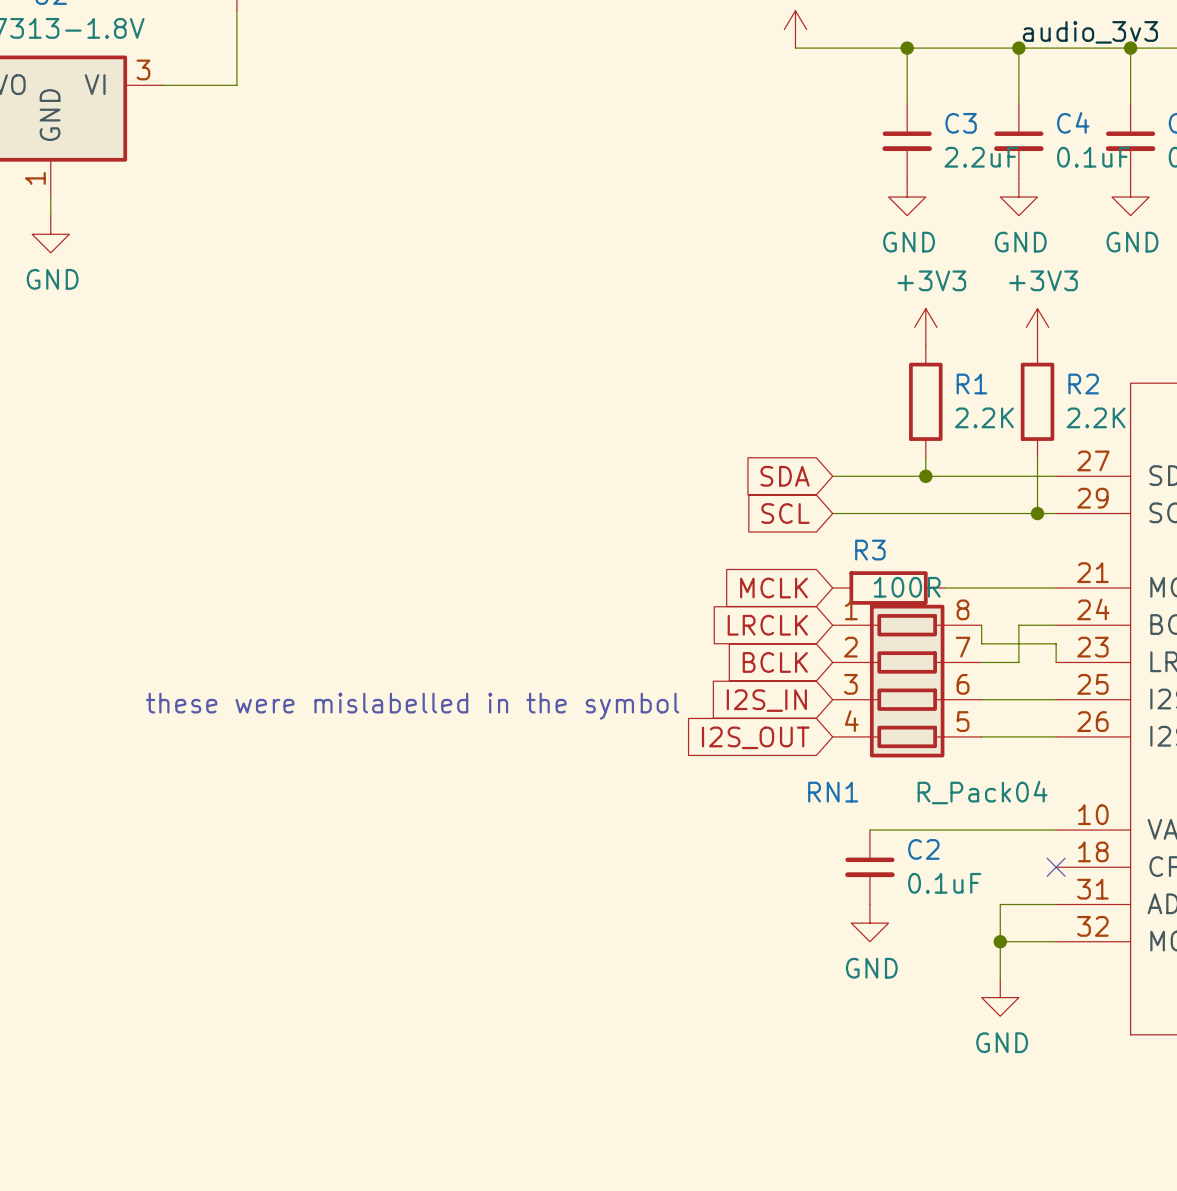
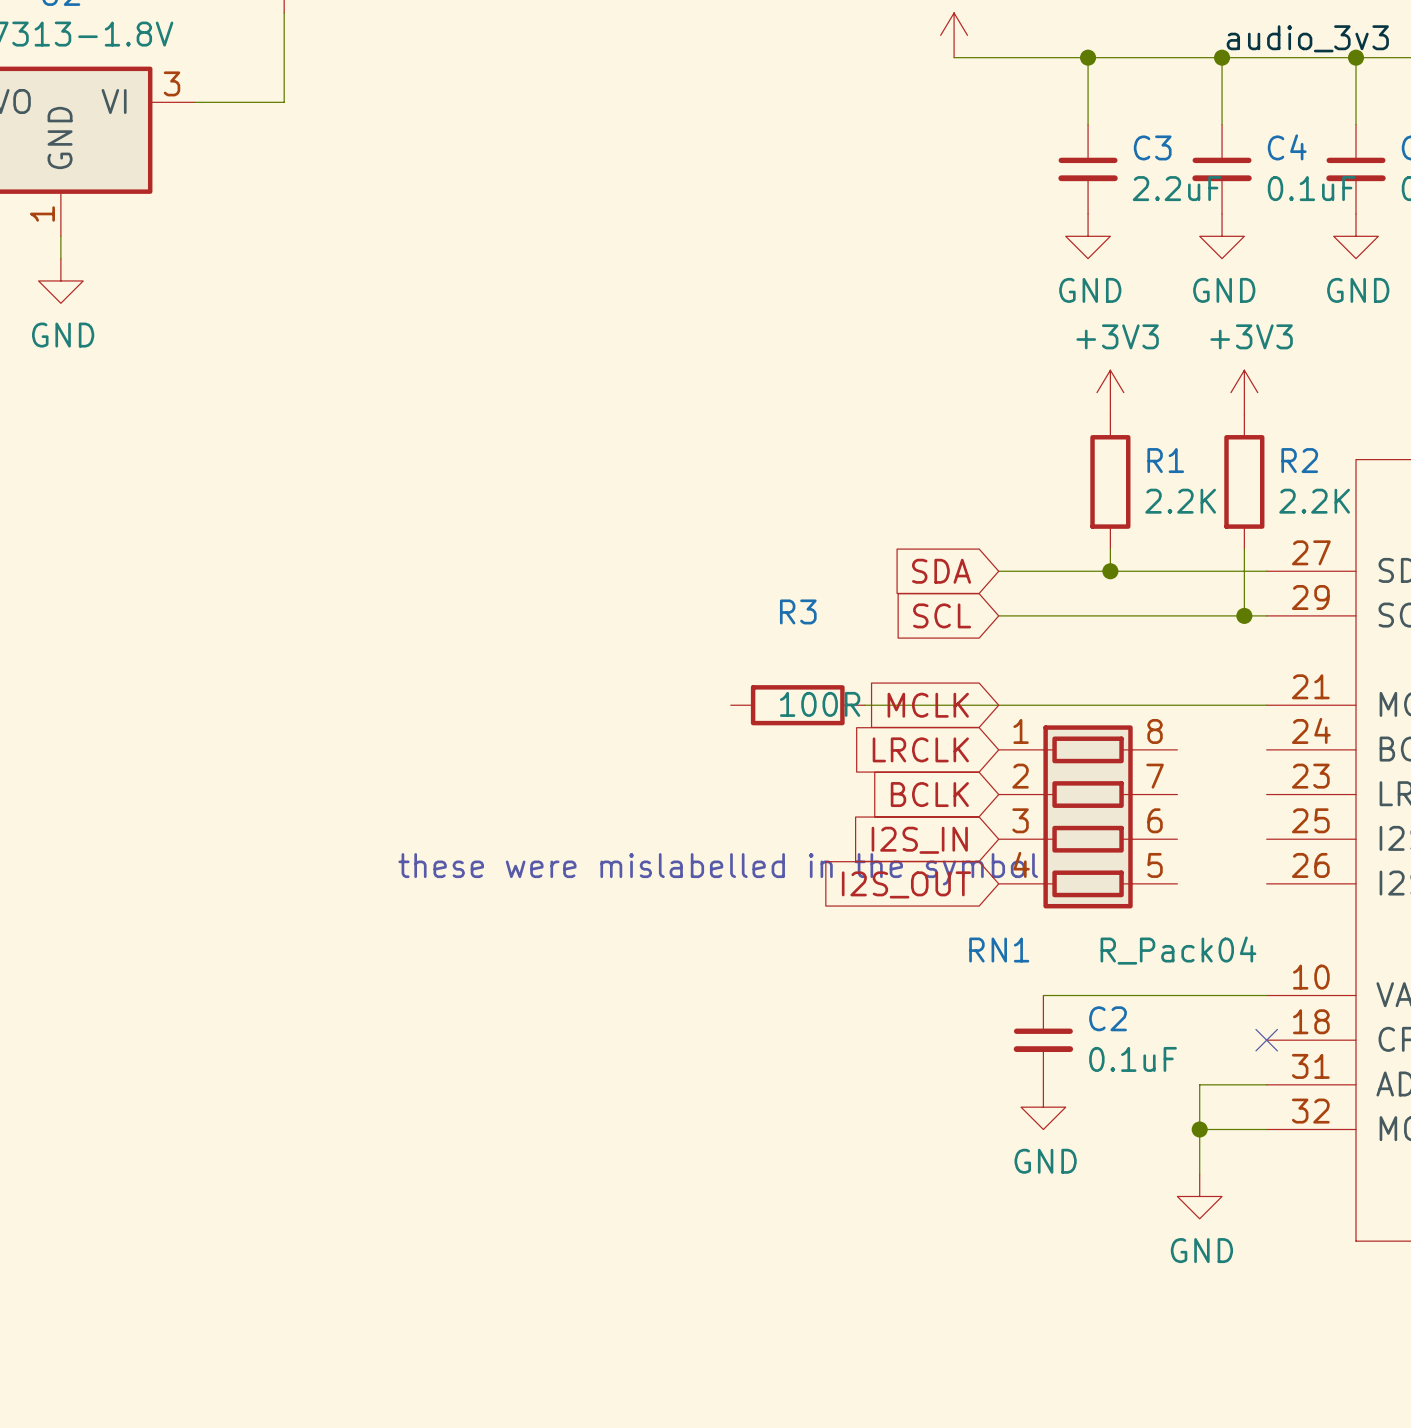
R3 name position: R3 (870, 550) -> R3 (798, 611)
wire: none -> (864, 705) (1132, 705)
R3 position: (888, 588) -> (797, 705)
wire: (981, 625) (981, 643) (1056, 643) (1056, 662) -> none
wire: (1056, 625) (1018, 625) (1018, 662) (981, 662) -> none
wire: (981, 699) (1056, 699) -> none
text position: these were mislabelled in the symbol (412, 706) -> these were mislabelled in the symbol (718, 869)
wire: (981, 736) (1056, 736) -> none

